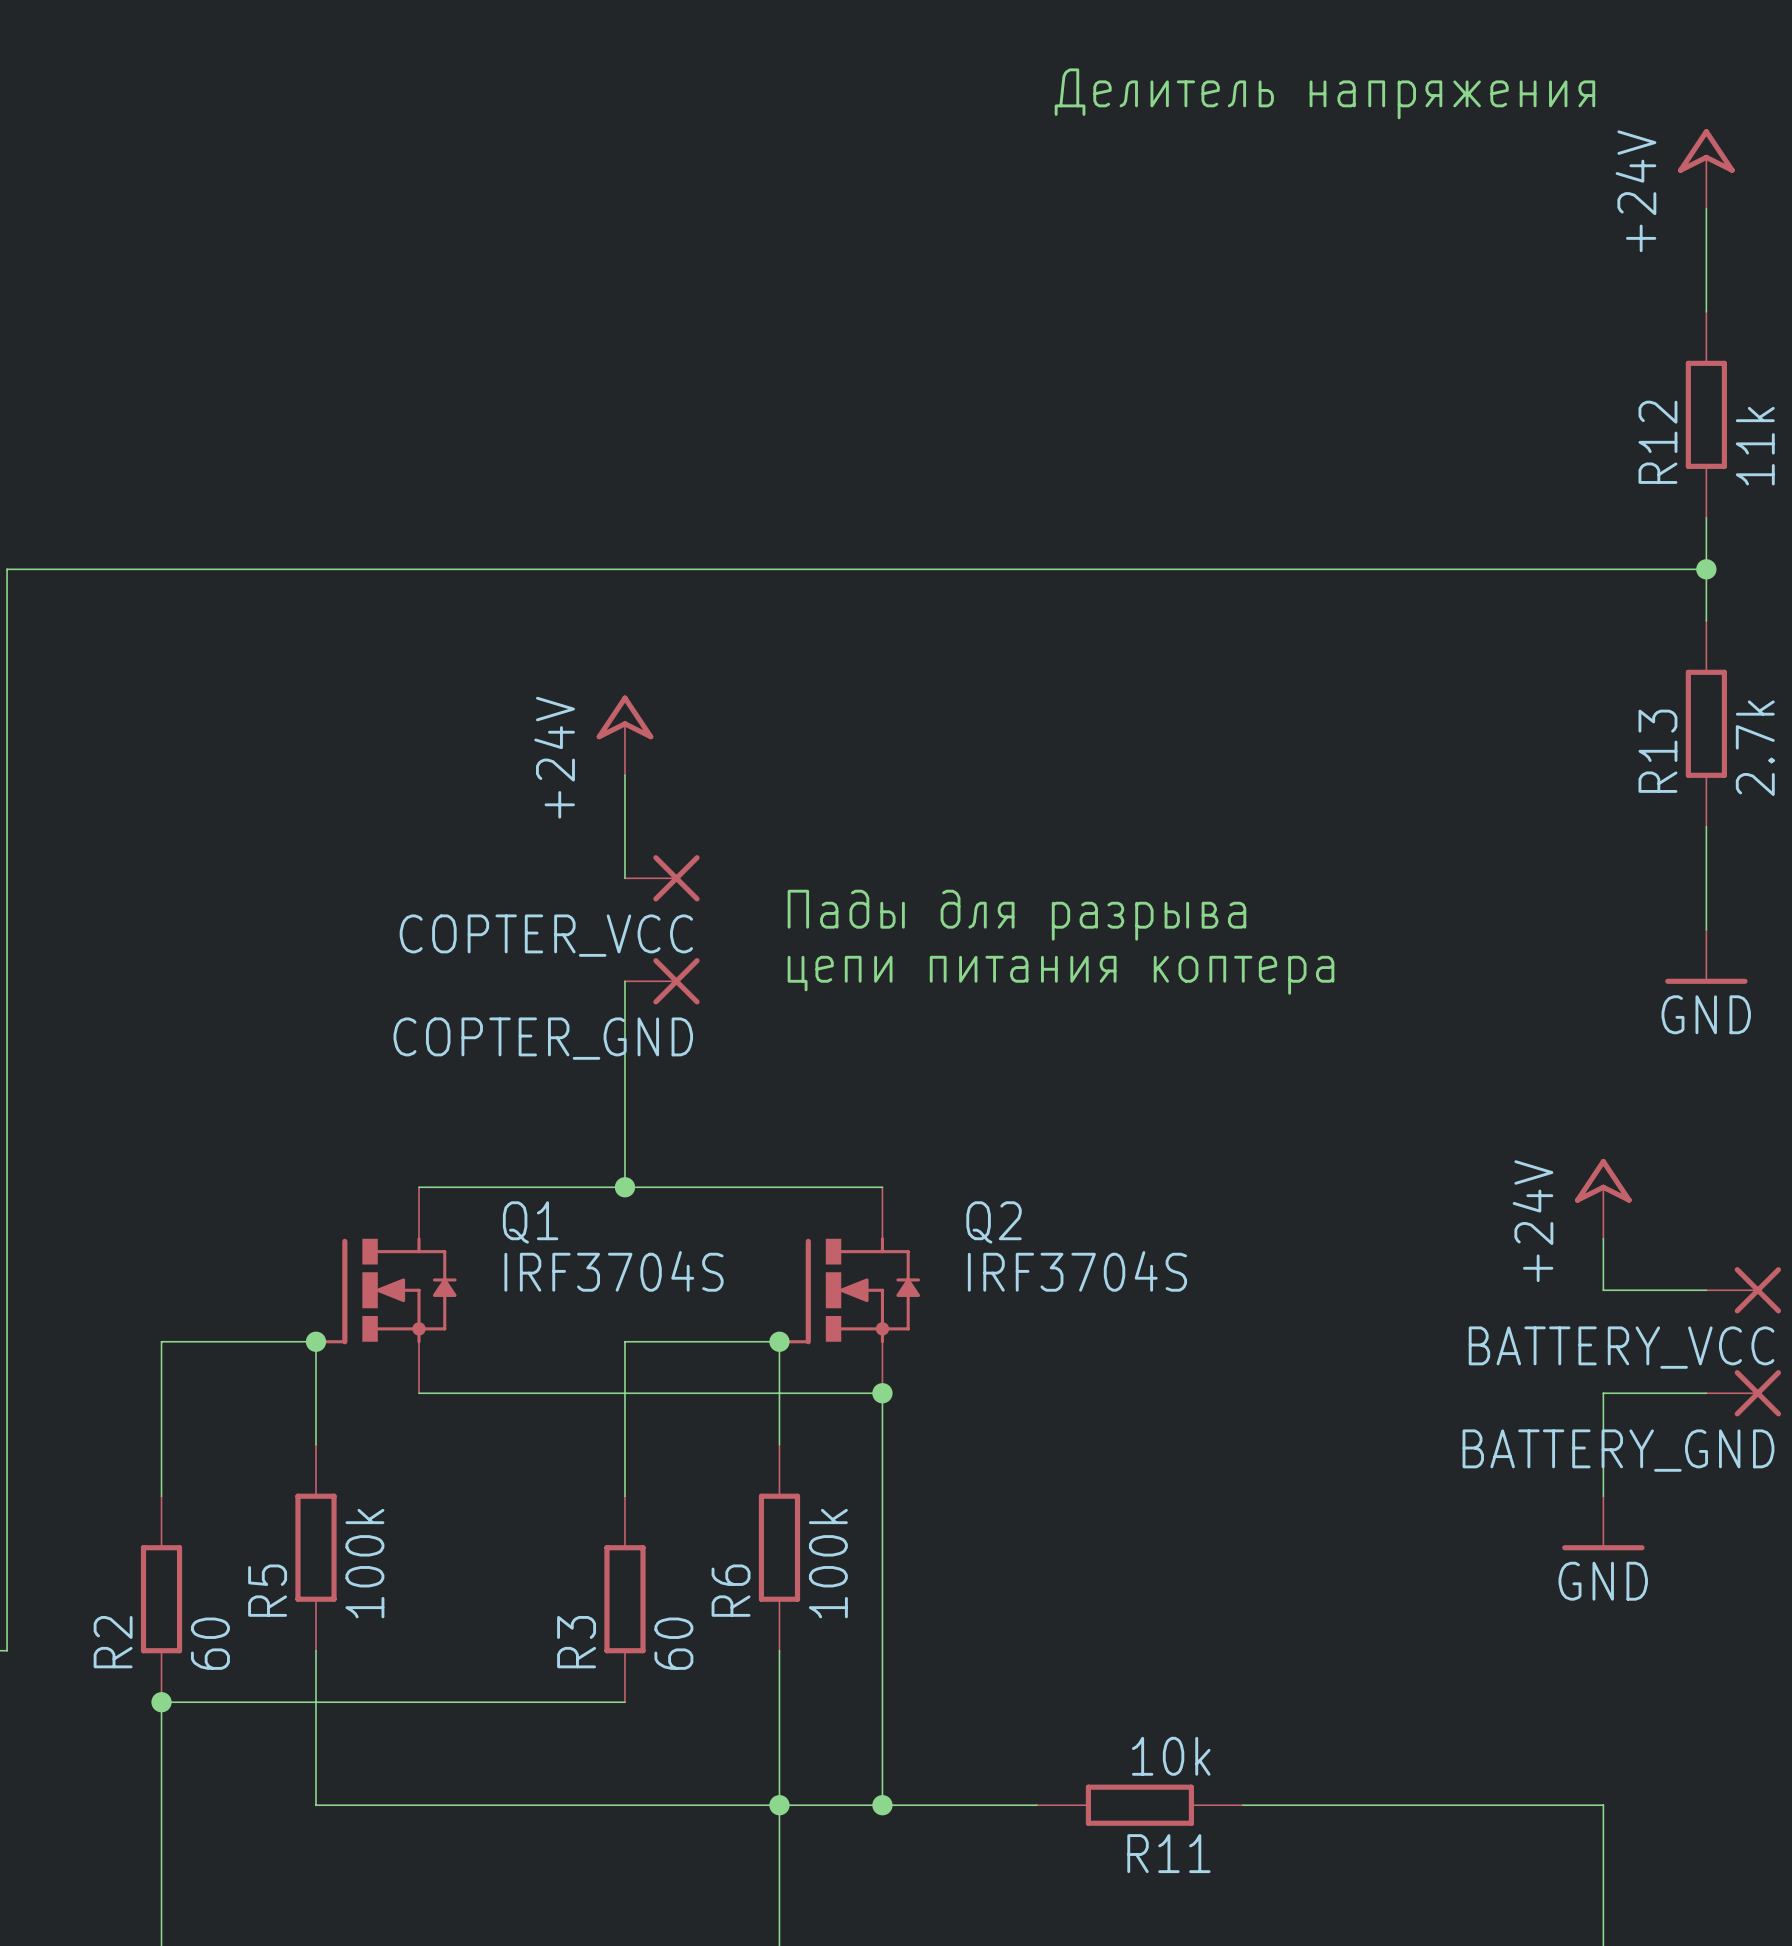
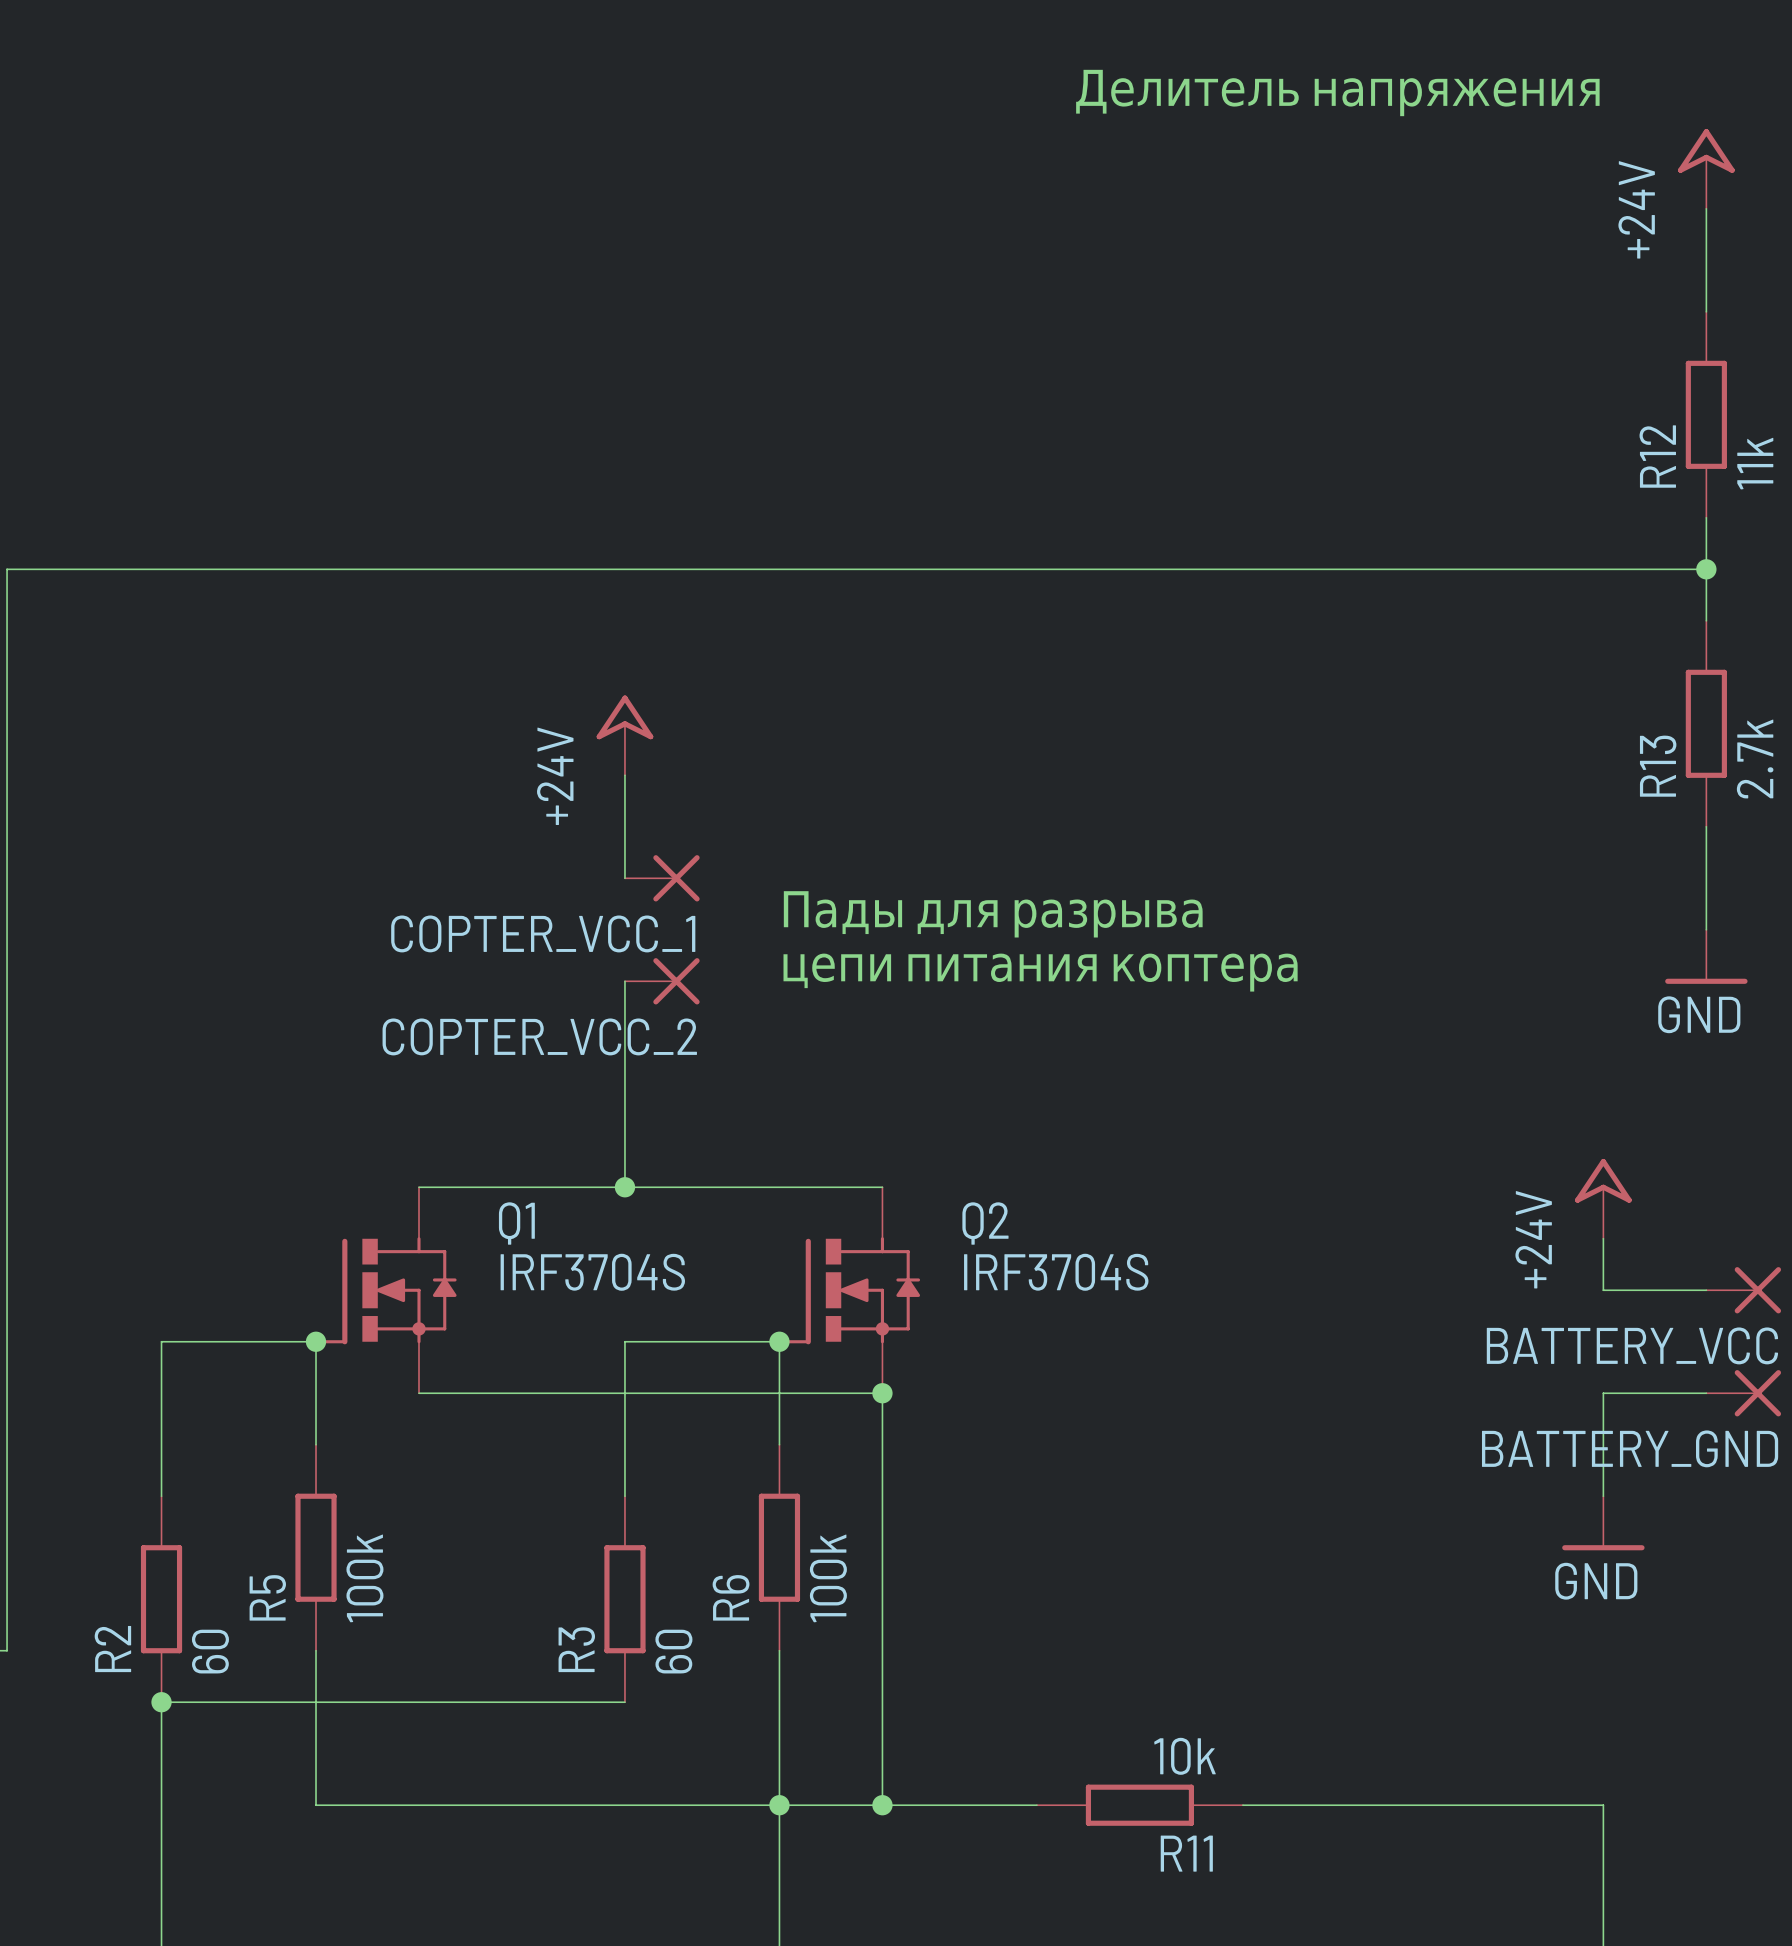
COPTER_VCC name: COPTER_VCC (546, 935) -> COPTER_VCC_1 (543, 933)
COPTER_GND name: COPTER_GND (543, 1038) -> COPTER_VCC_2 (539, 1036)

